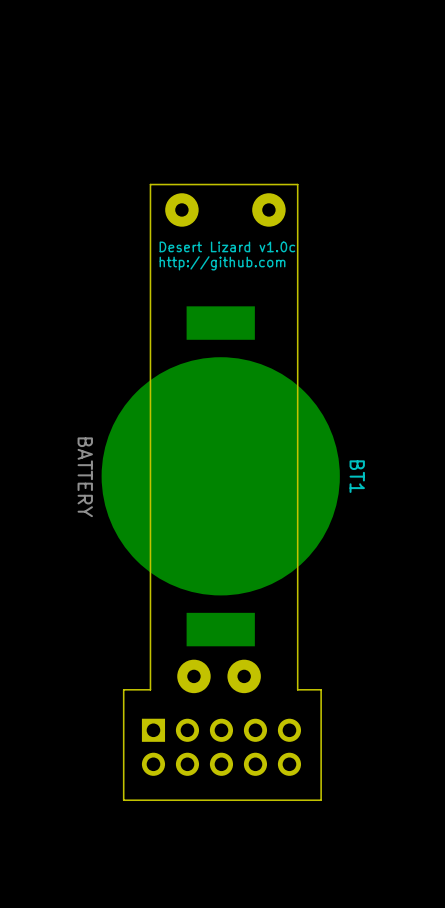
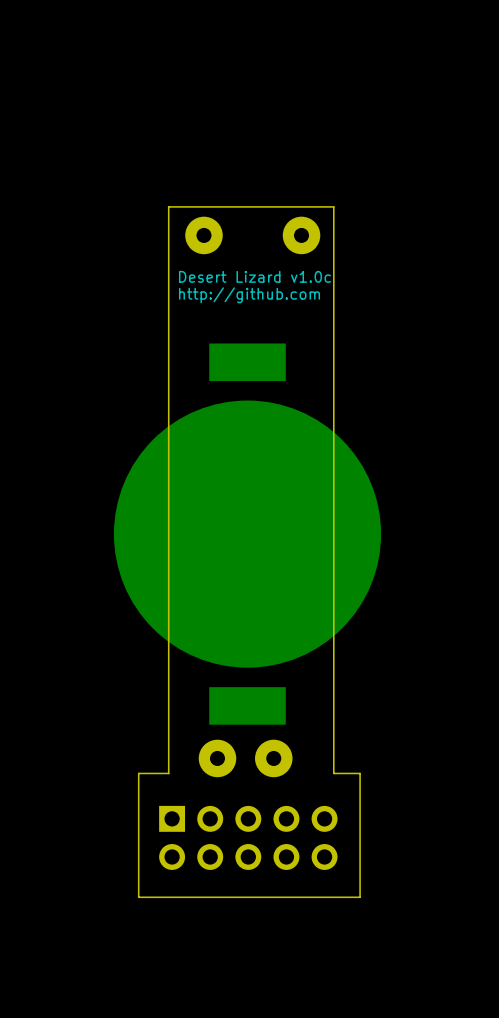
BT1 name: BT1 (357, 476) -> none
BT1 value: BATTERY (85, 477) -> none

